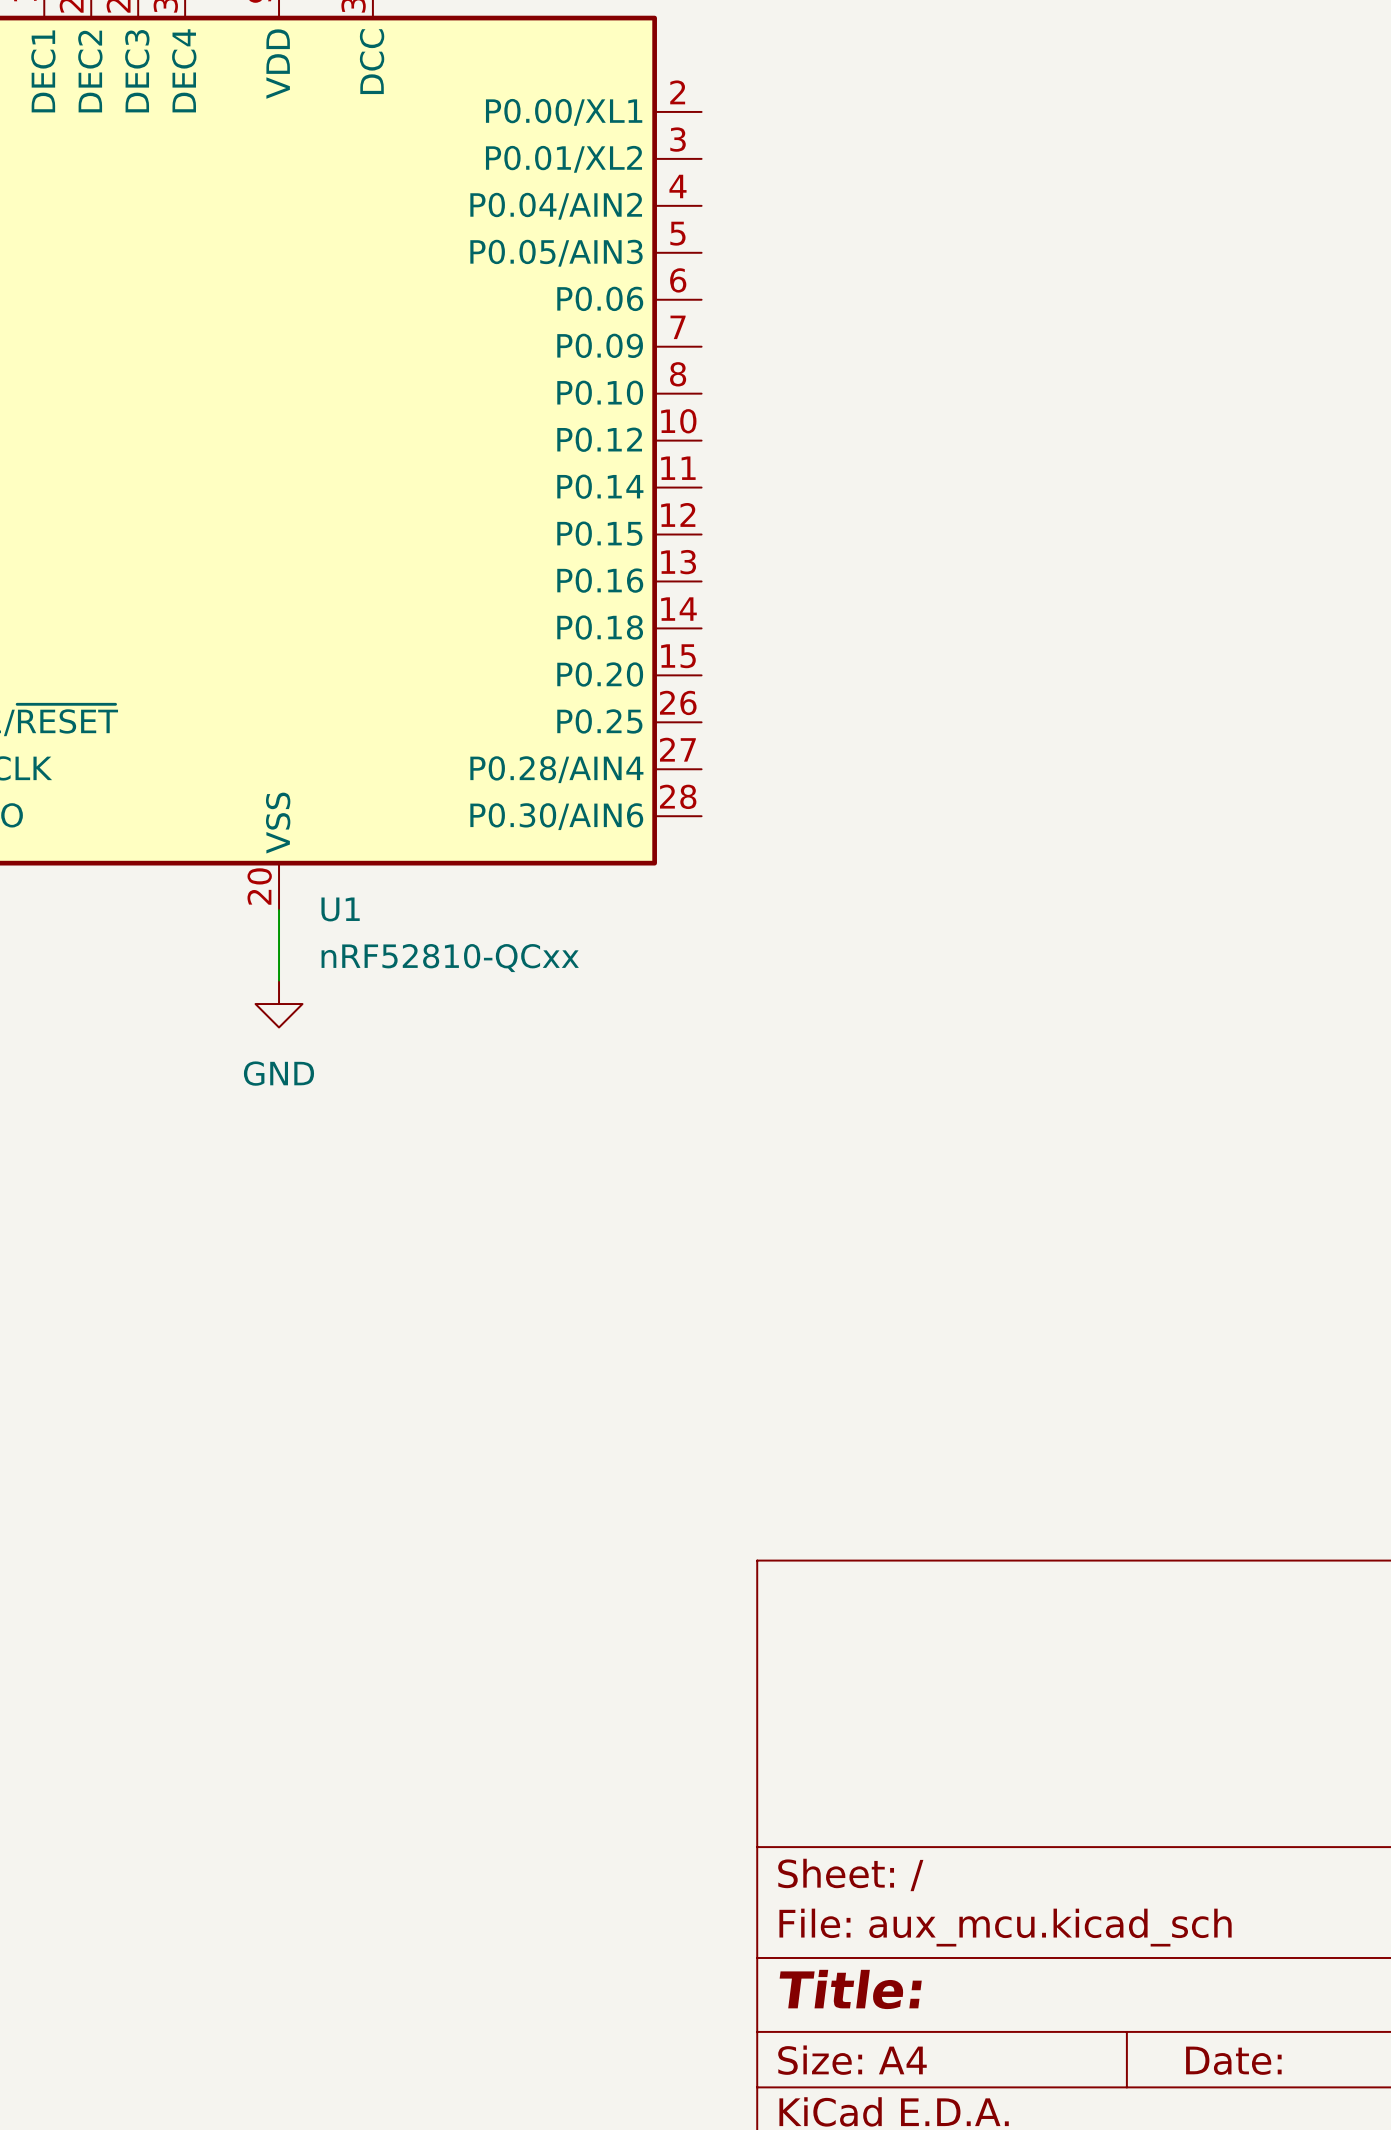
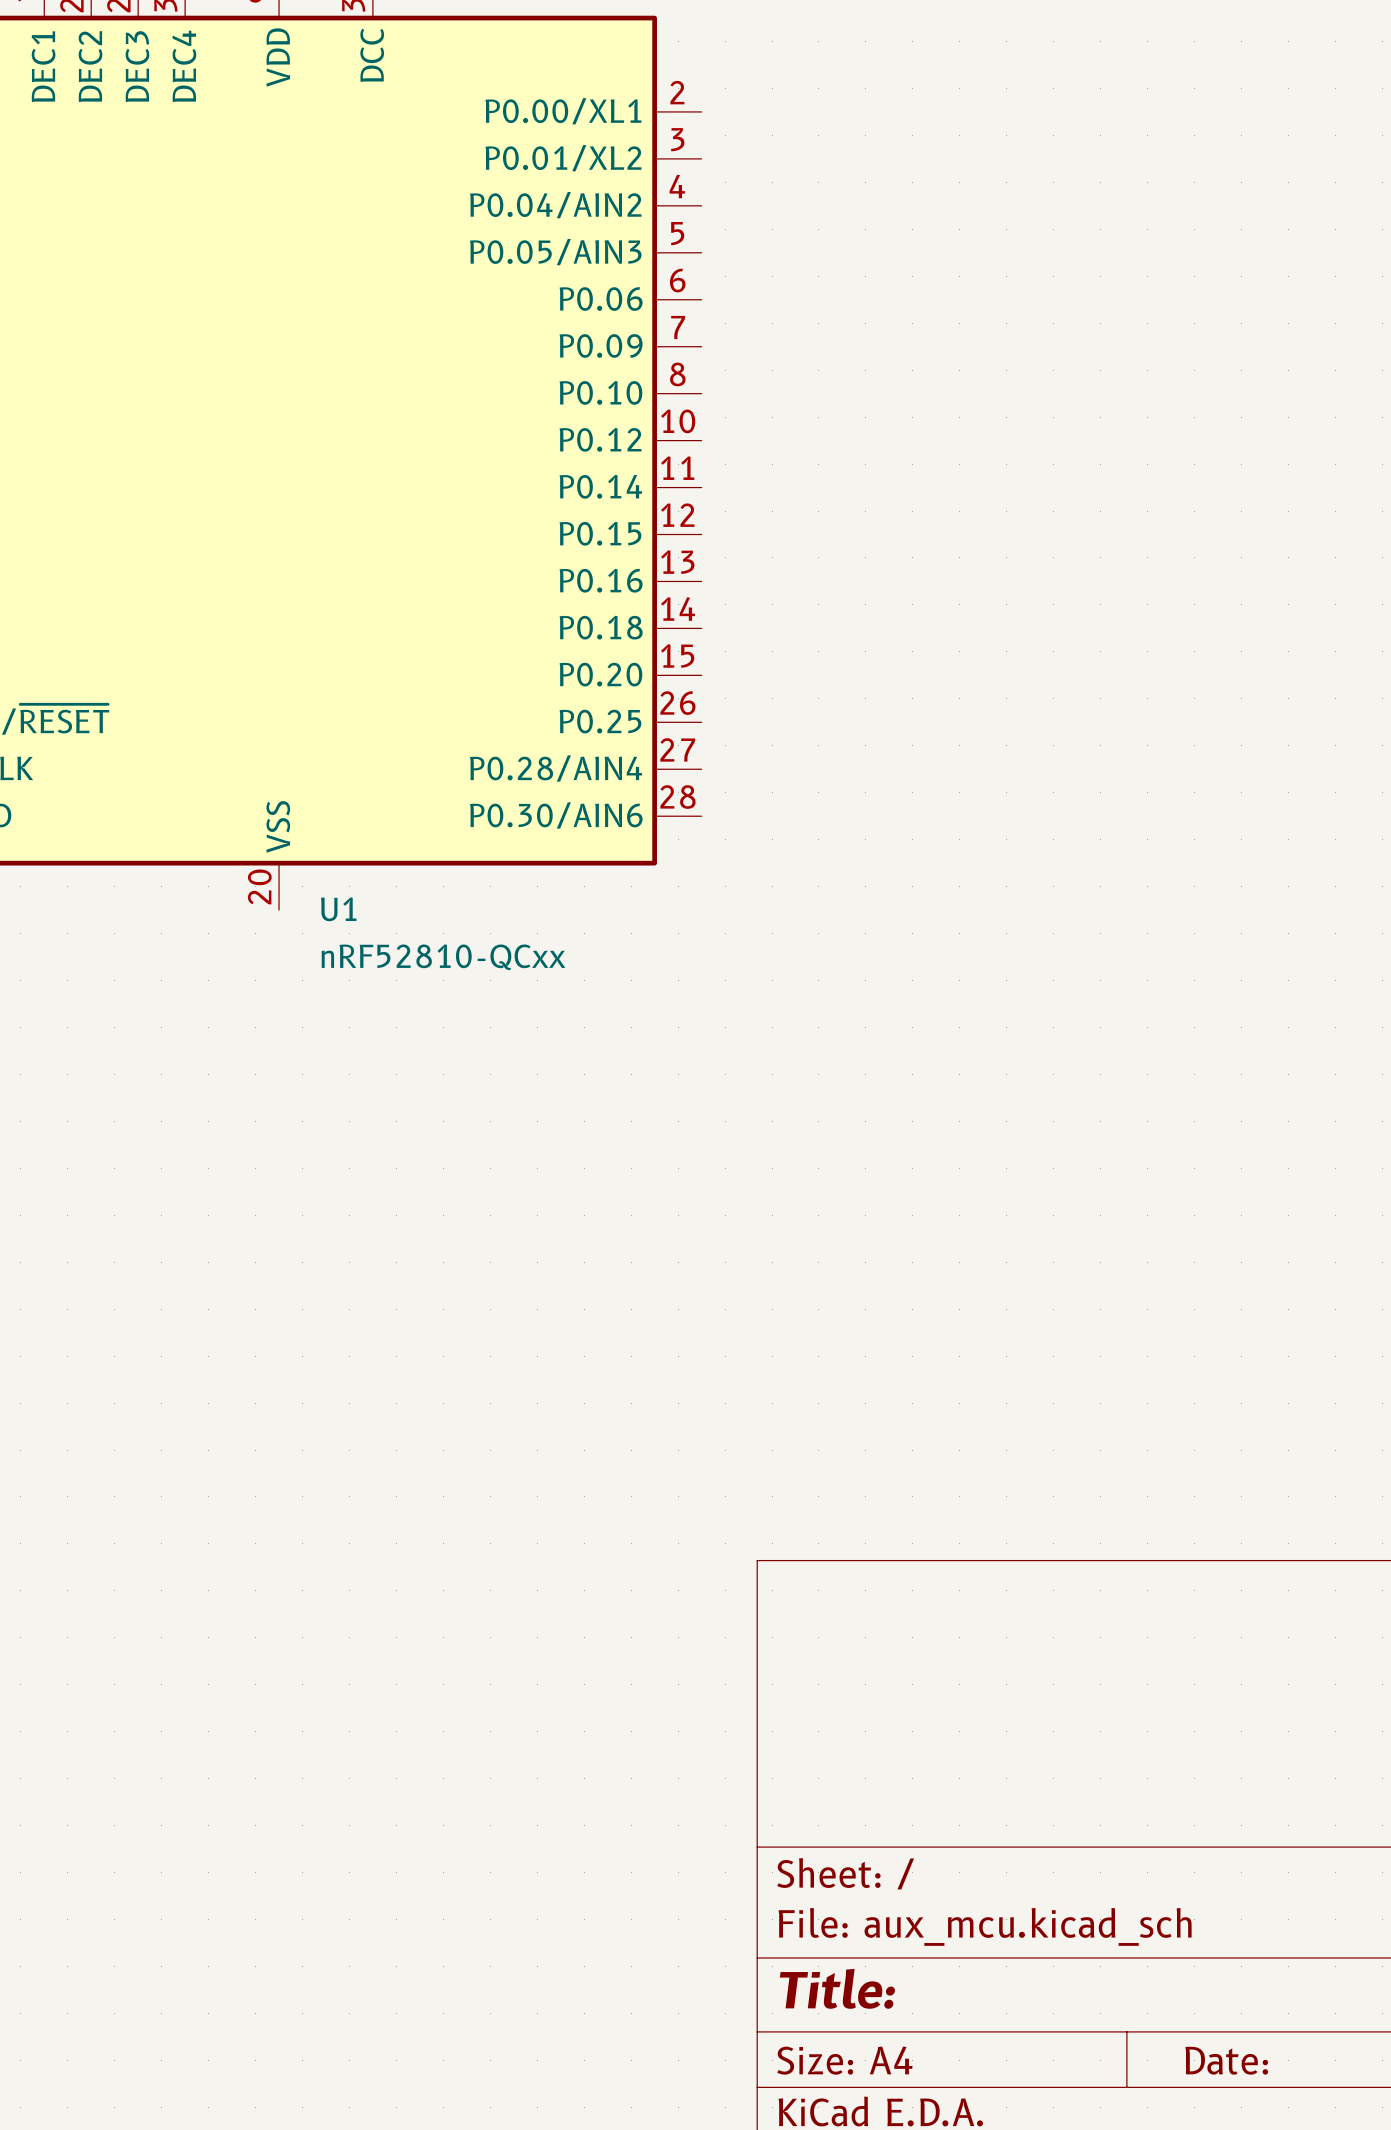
wire: (279, 910) (279, 980) -> none
power symbol: GND (279, 1004) -> none

